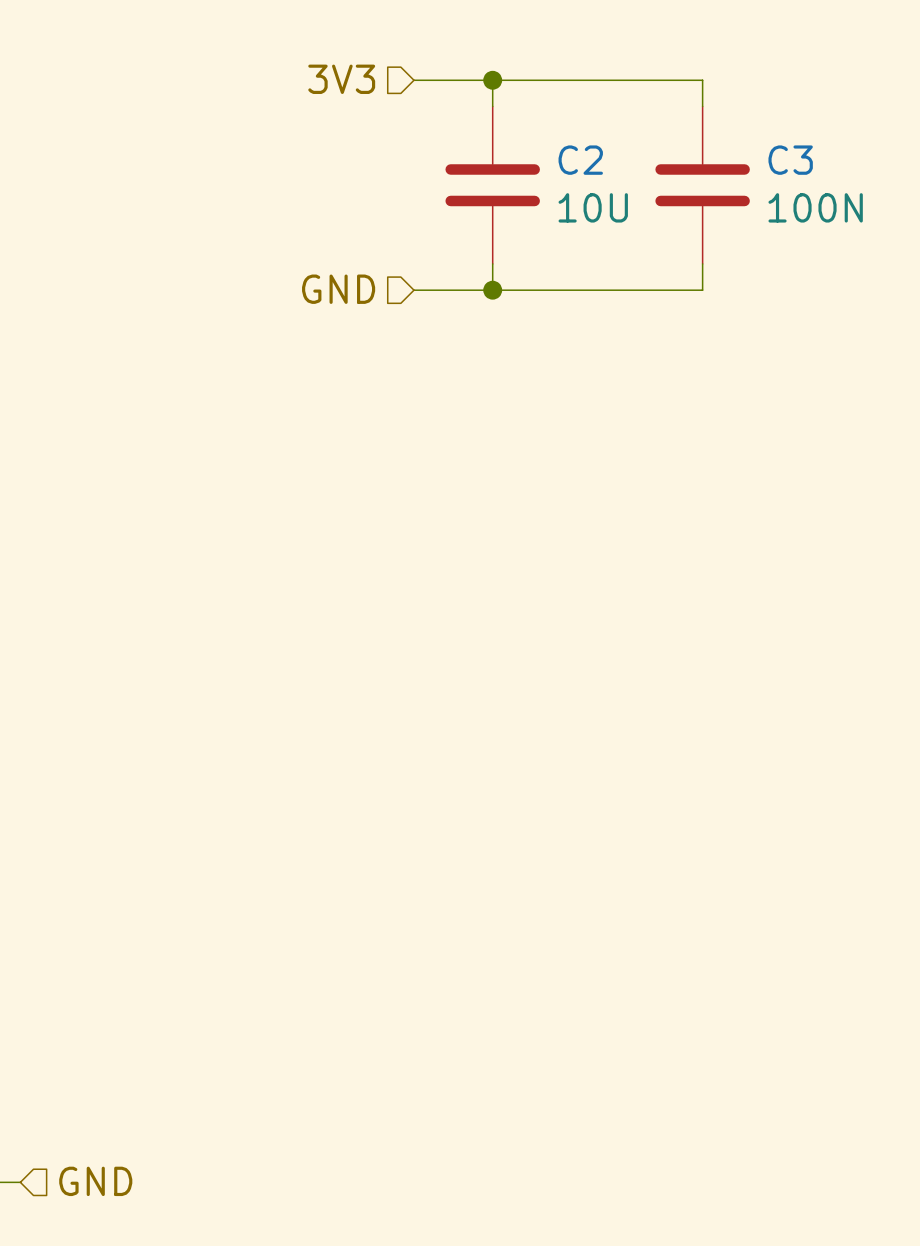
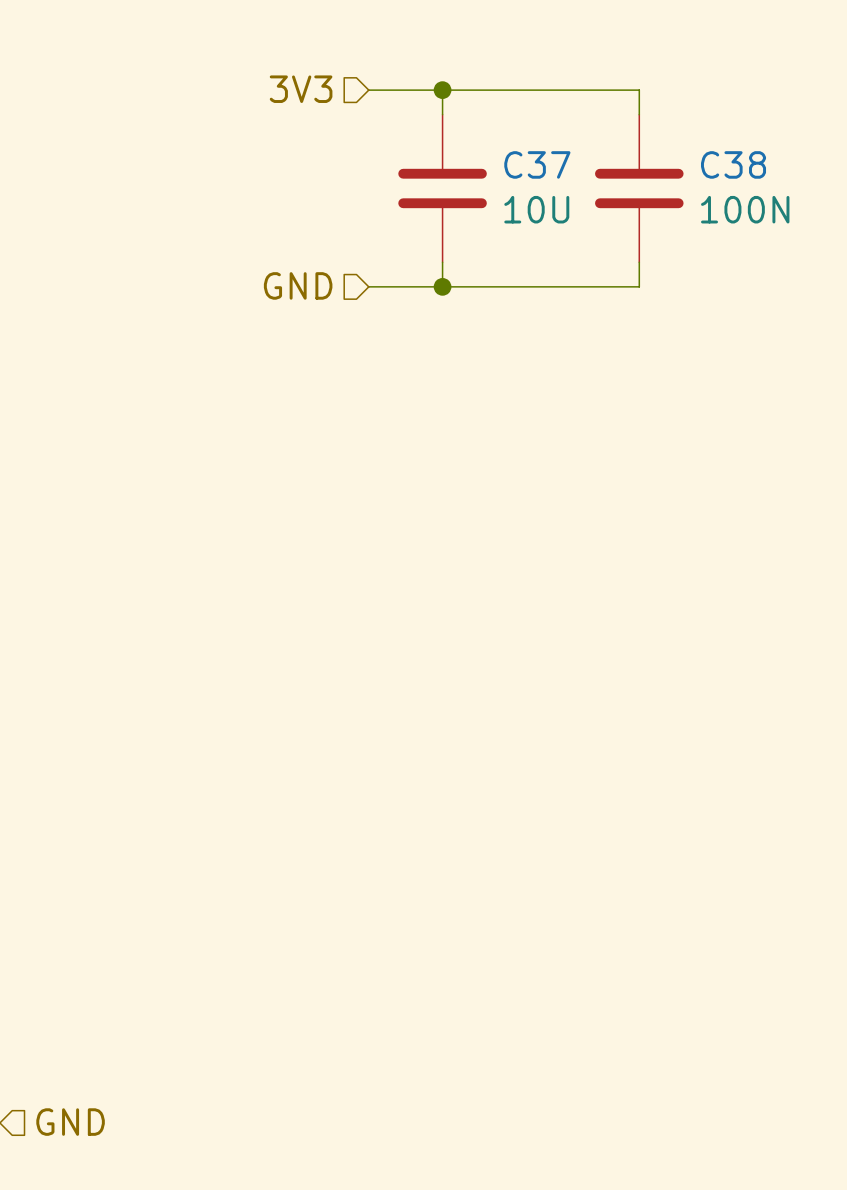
C2 name: C2 (580, 160) -> C37 (537, 164)
C3 name: C3 (790, 160) -> C38 (733, 164)

